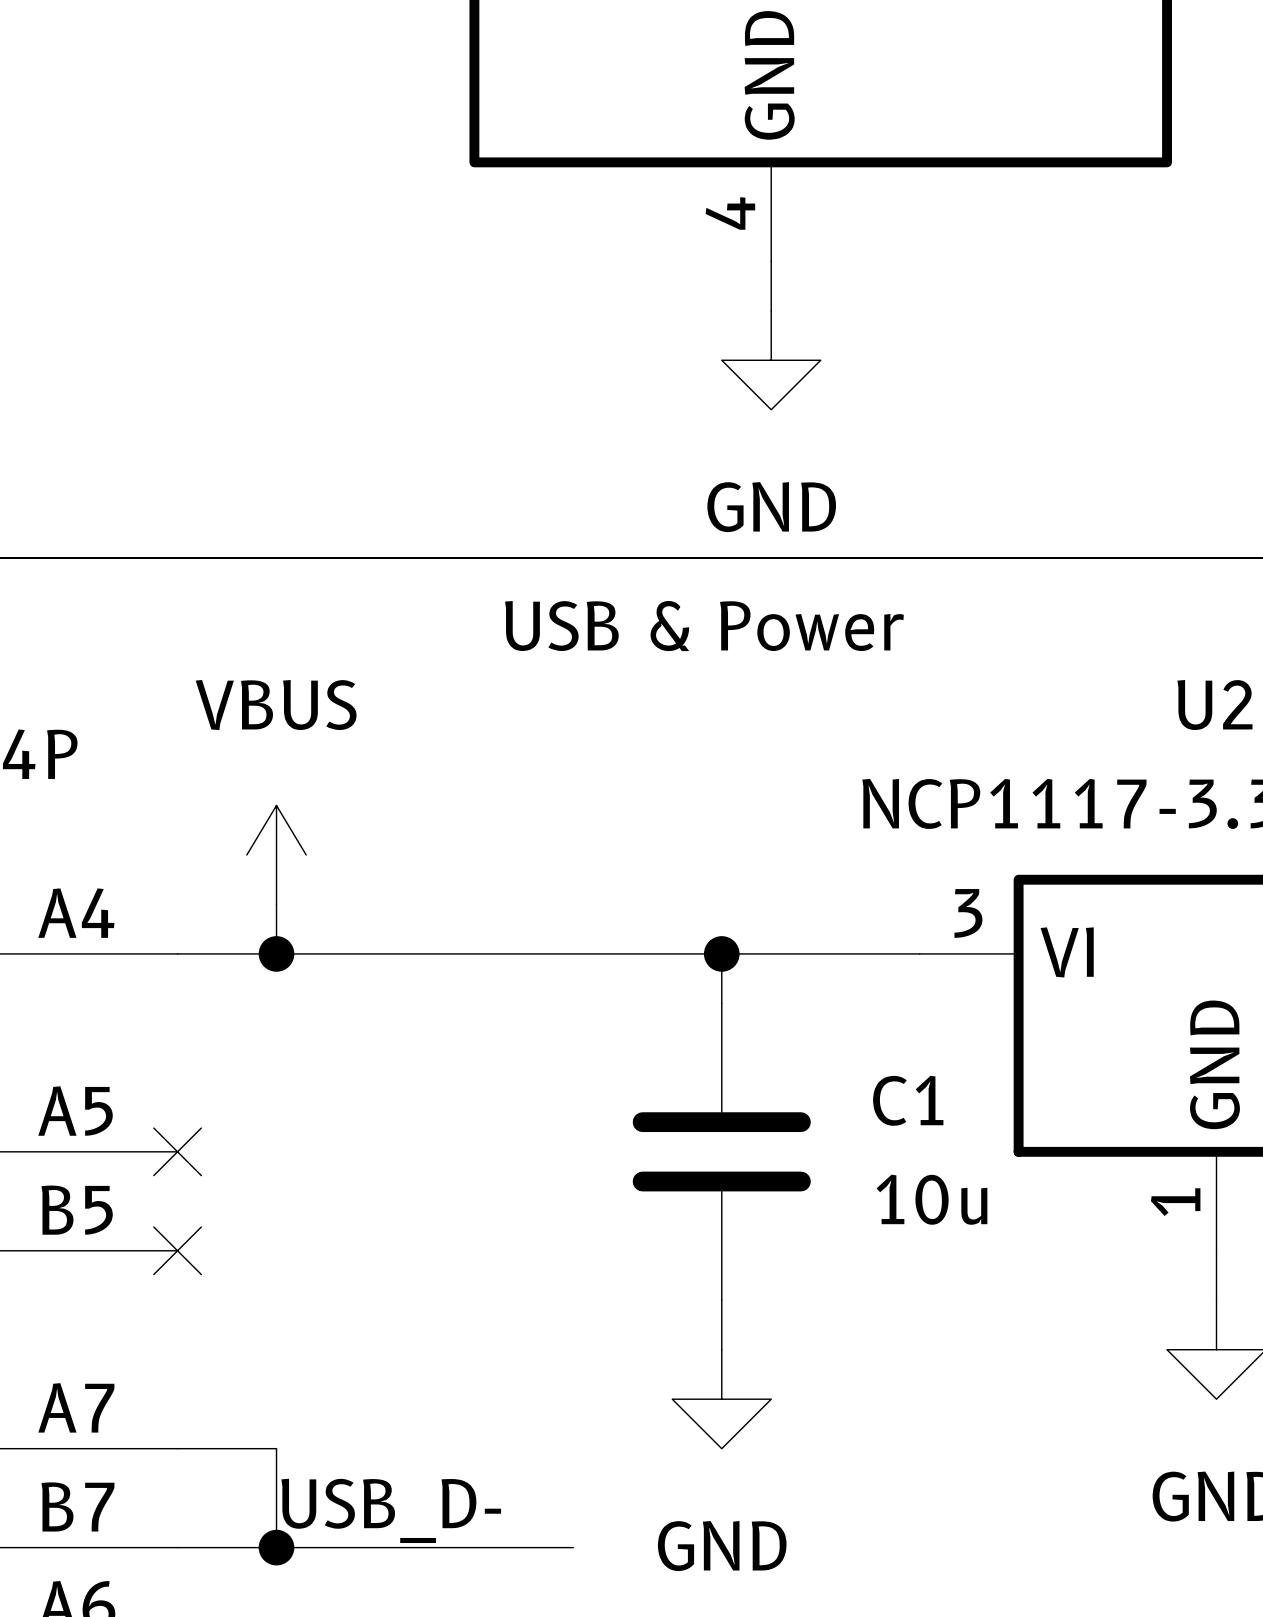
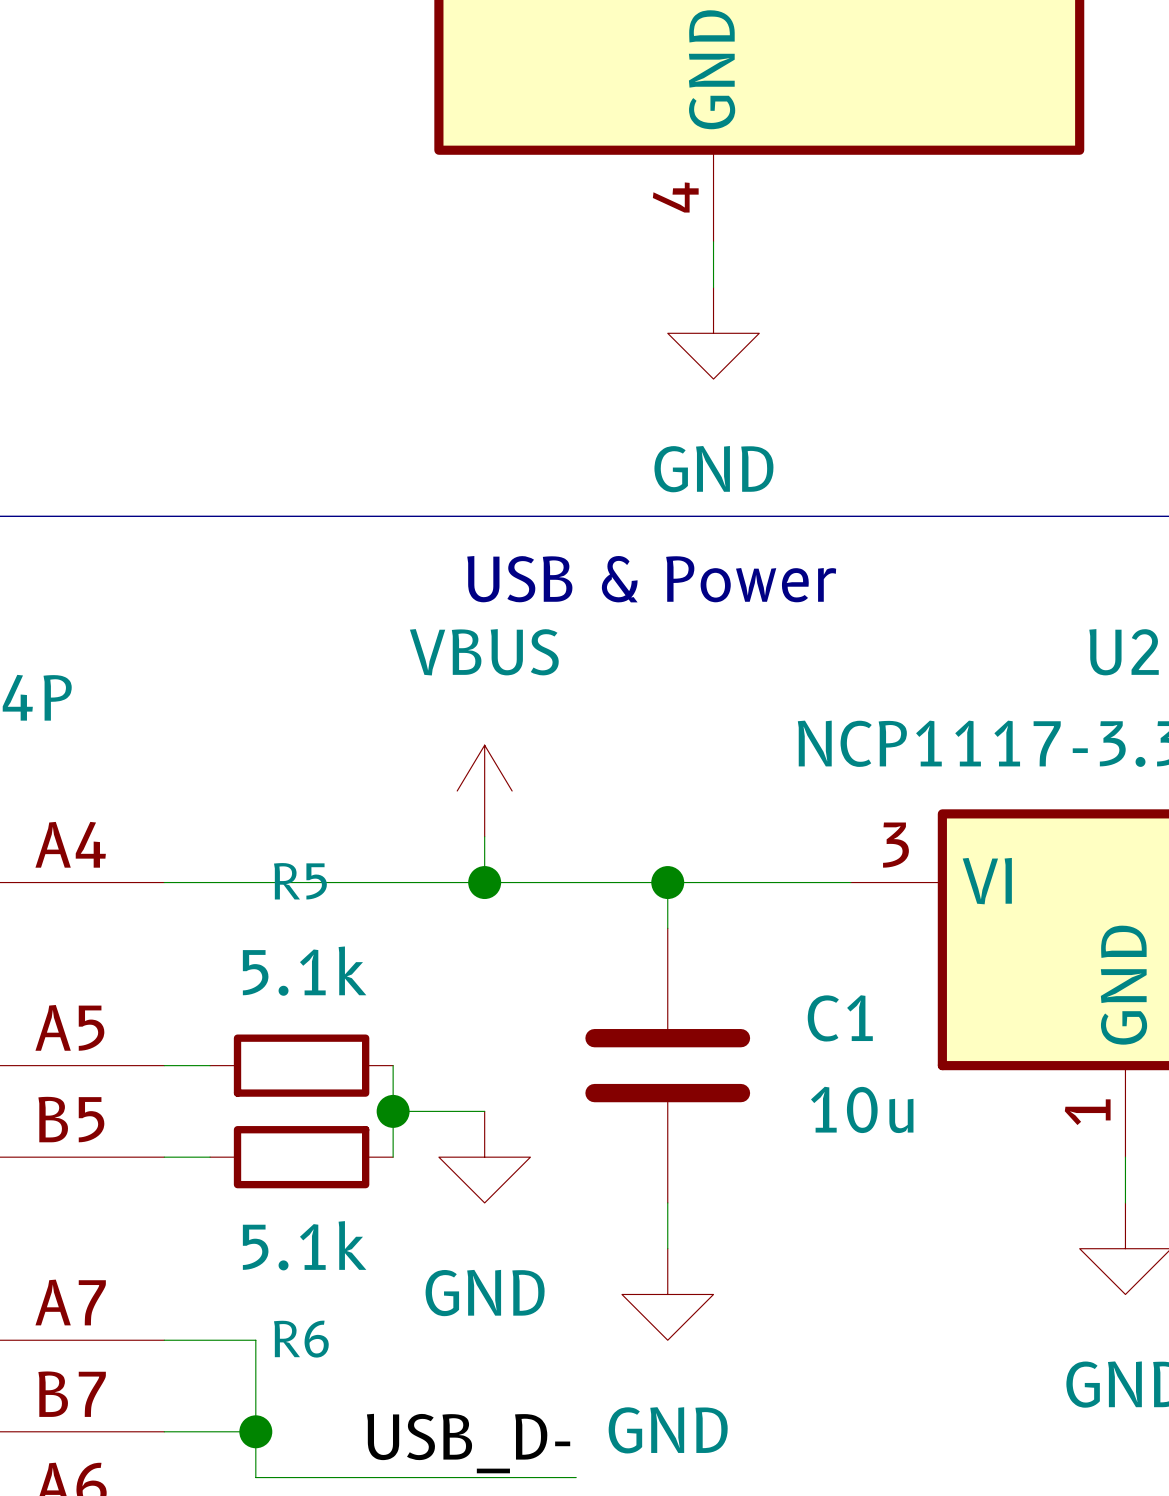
power symbol position: VBUS (276, 854) -> VBUS (484, 791)
wire: (276, 904) (276, 953) -> (484, 836) (484, 882)
junction: (276, 953) -> none
junction: none -> (484, 882)
wire: none -> (164, 1065) (210, 1065)
no-connect mark: (177, 1151) -> none
R5: none -> 5.1k (301, 1065)
wire: none -> (393, 1065) (393, 1157)
wire: none -> (393, 1111) (484, 1111)
junction: none -> (393, 1111)
wire: none -> (164, 1157) (210, 1157)
no-connect mark: (177, 1250) -> none
R6: none -> 5.1k (301, 1157)
power symbol: none -> GND (484, 1157)
label position: USB_D- (391, 1510) -> USB_D- (468, 1443)
wire: (276, 1547) (573, 1547) -> (255, 1431) (255, 1477) (576, 1477)

